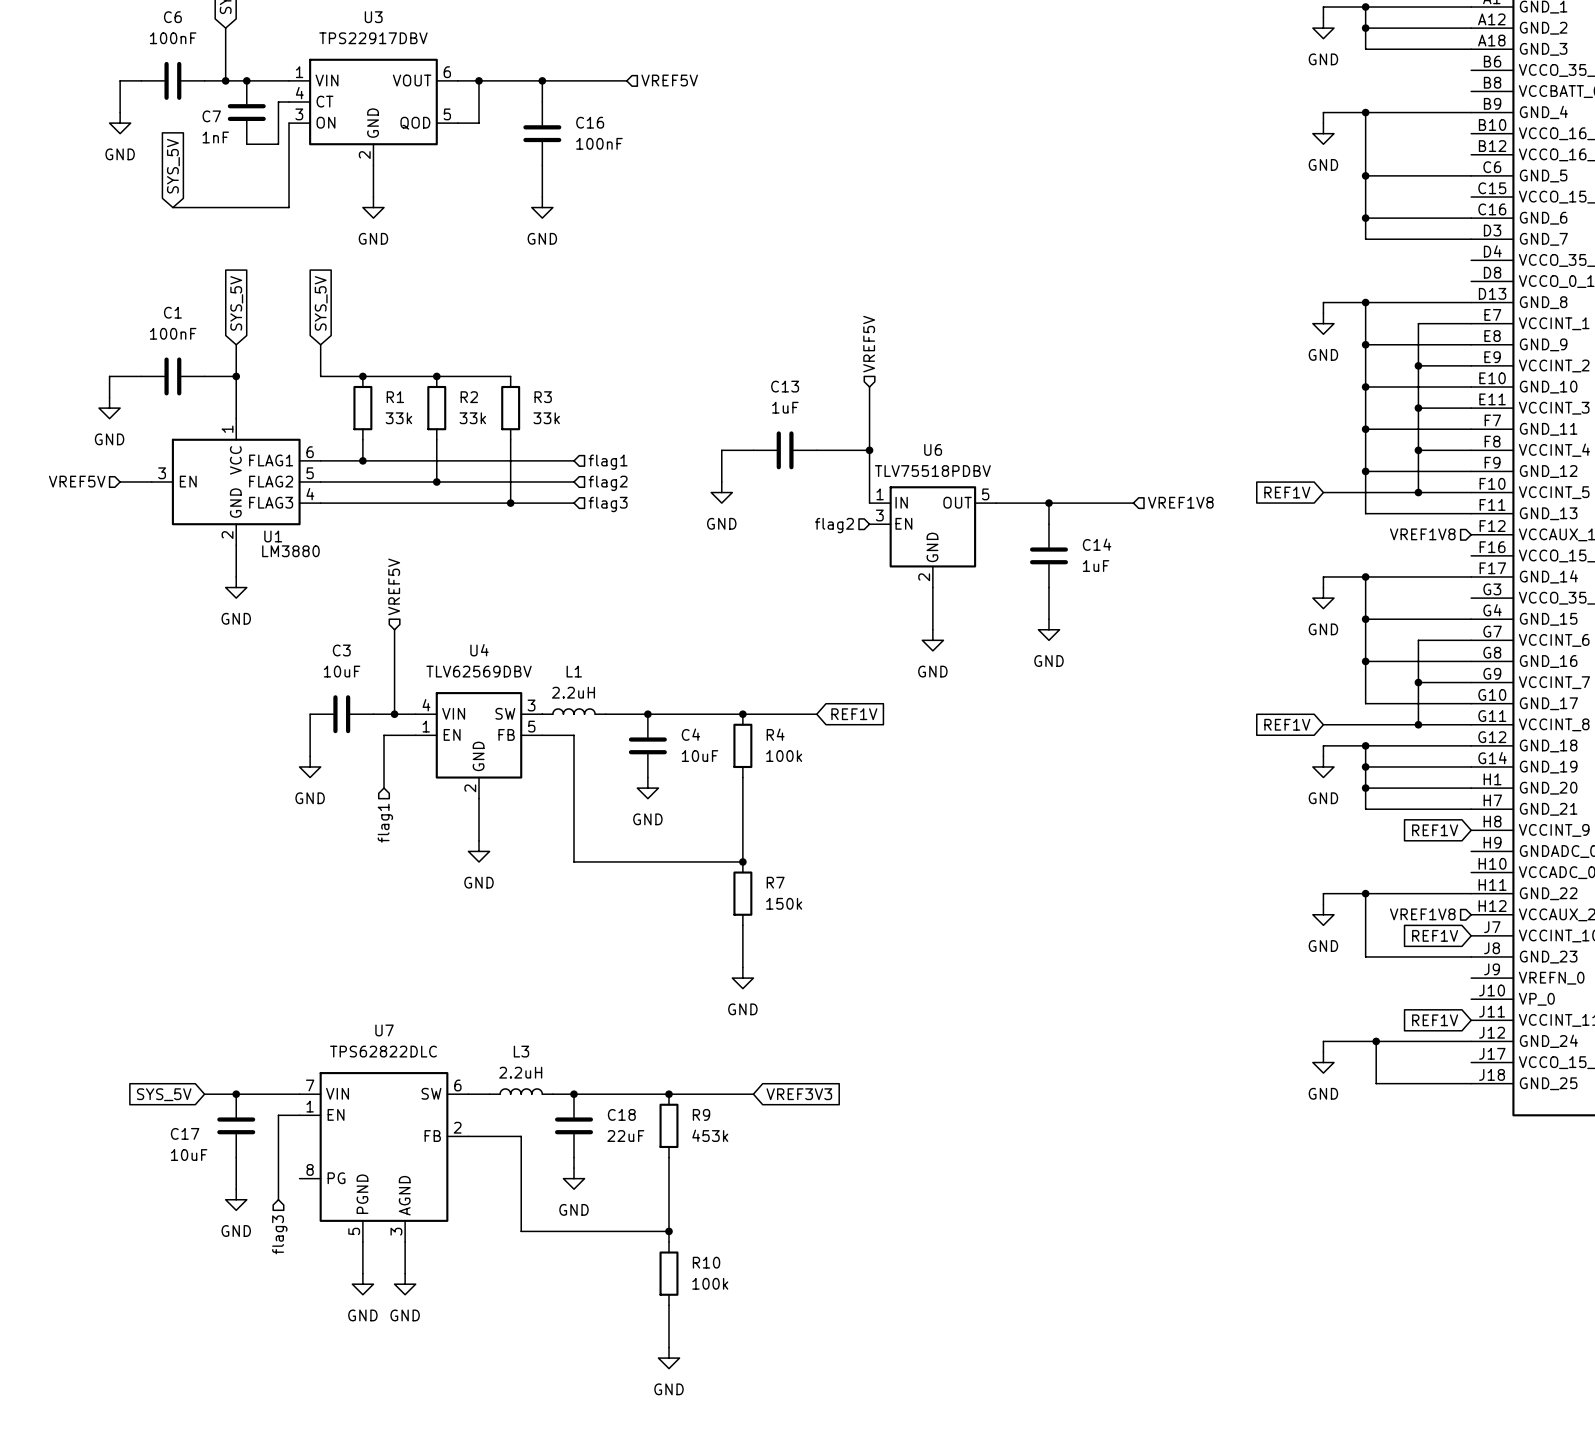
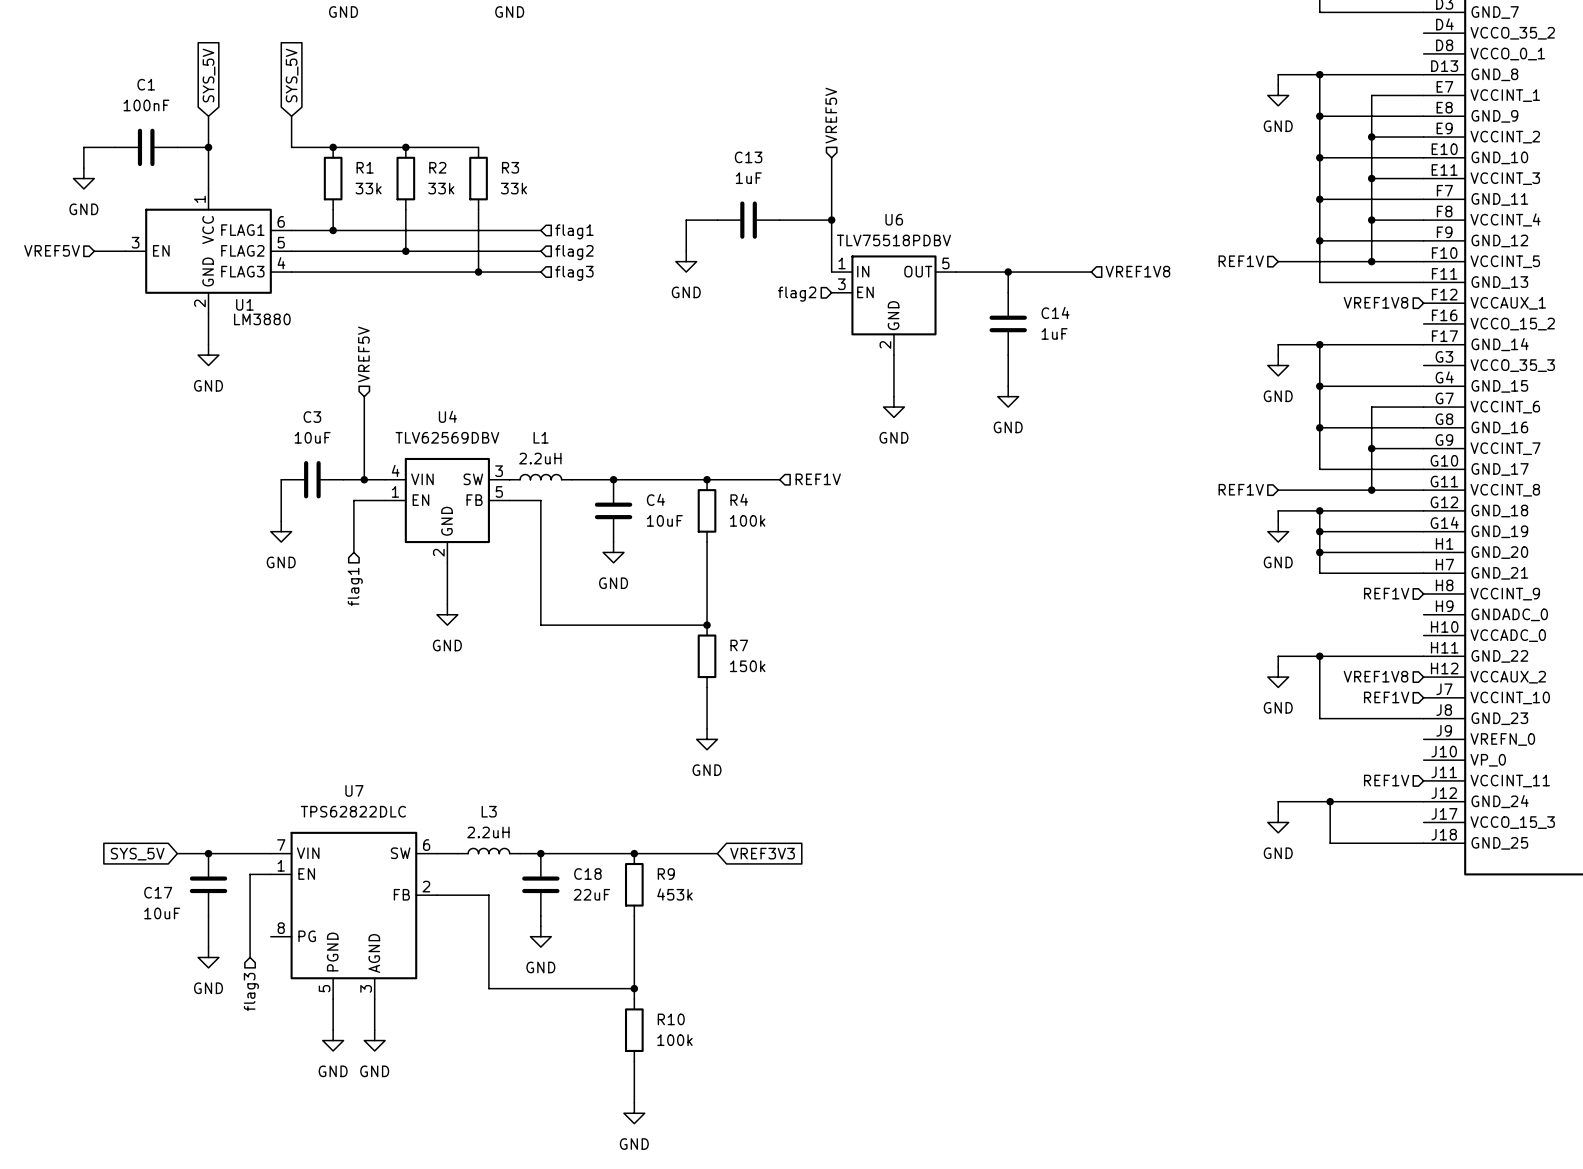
hierarchical label: none -> REF1V (1241, 261)
global label: REF1V (1287, 492) -> none
hierarchical label: none -> REF1V (818, 479)
global label: REF1V (854, 714) -> none
hierarchical label: none -> REF1V (1241, 489)
global label: REF1V (1287, 724) -> none
hierarchical label: none -> REF1V (1386, 593)
global label: REF1V (1435, 830) -> none
hierarchical label: none -> REF1V (1386, 697)
global label: REF1V (1435, 935) -> none
hierarchical label: none -> REF1V (1386, 780)
global label: REF1V (1435, 1020) -> none

